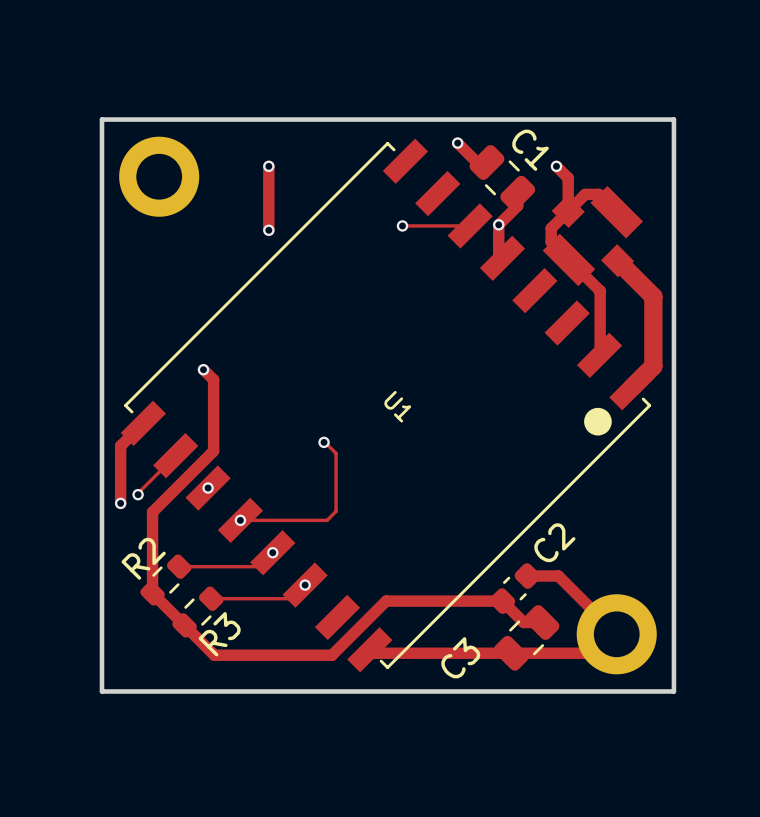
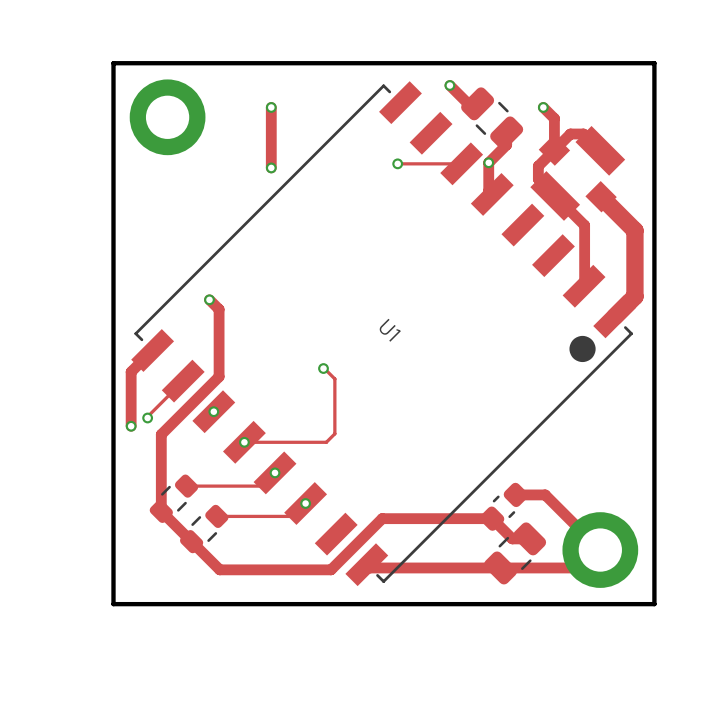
C1 name: C1 (530, 150) -> none
C2 name: C2 (554, 542) -> none
R2 name: R2 (143, 558) -> none
R3 name: R3 (219, 634) -> none
C3 name: C3 (460, 657) -> none

